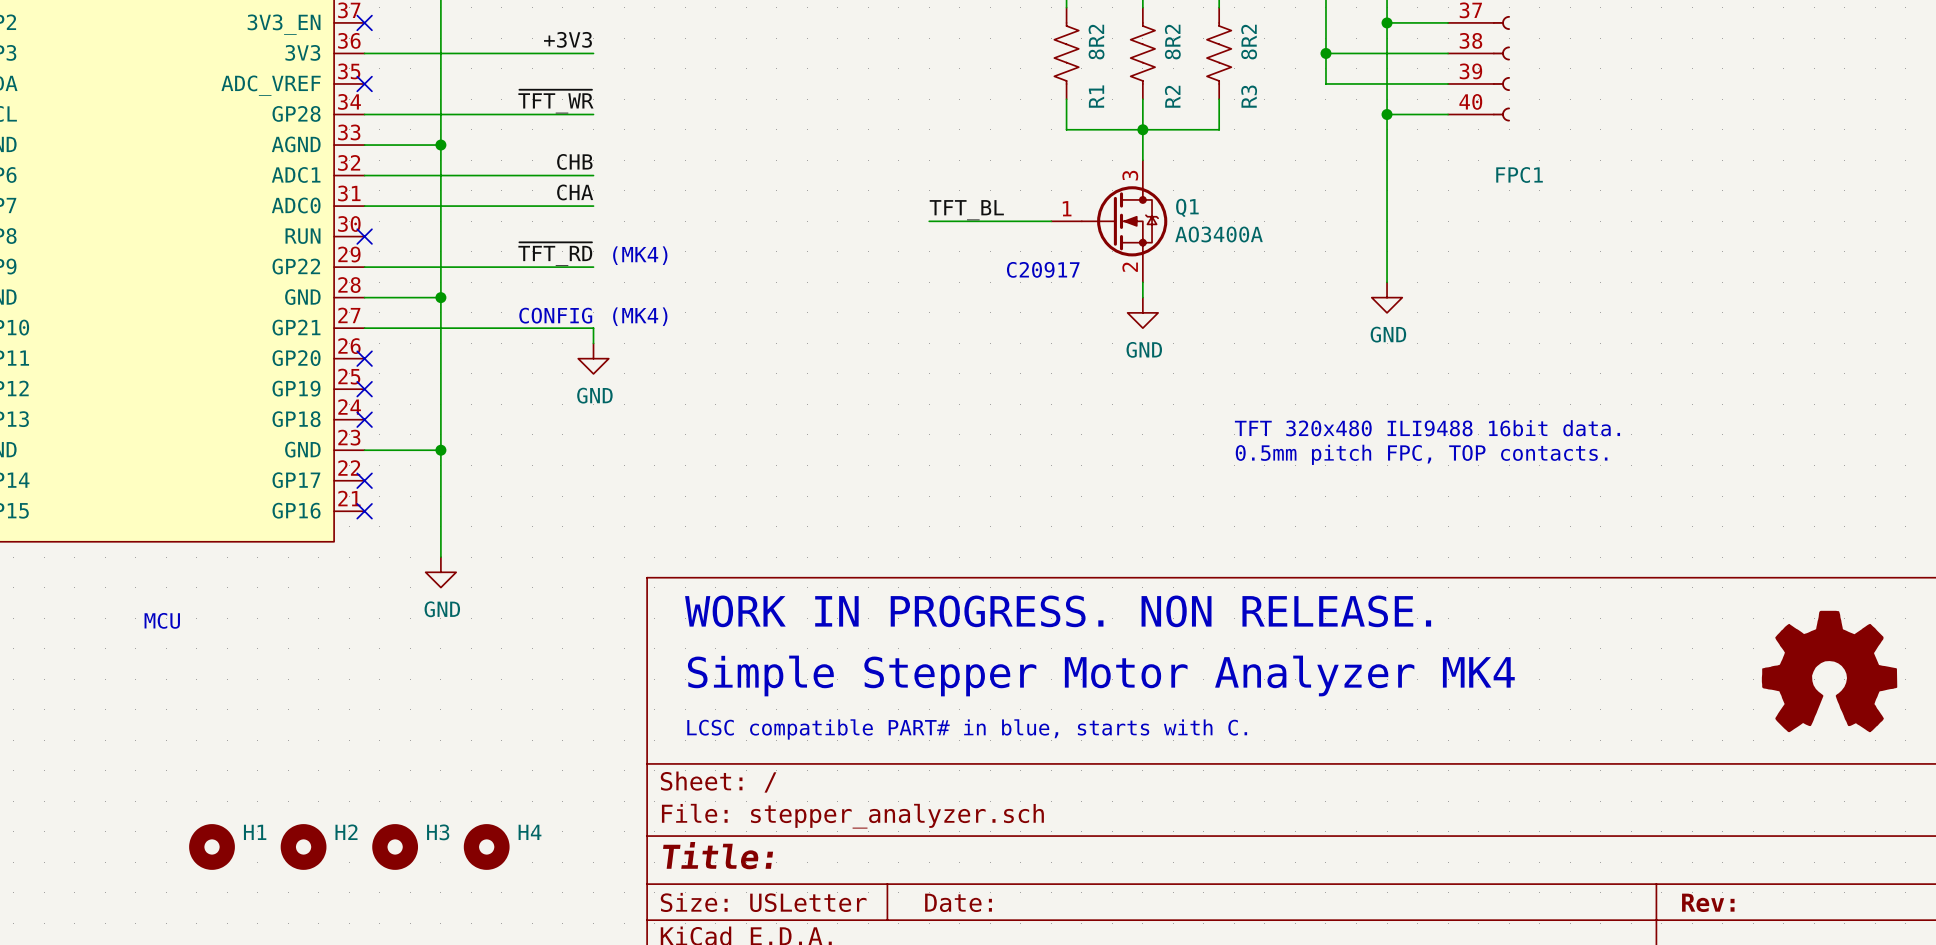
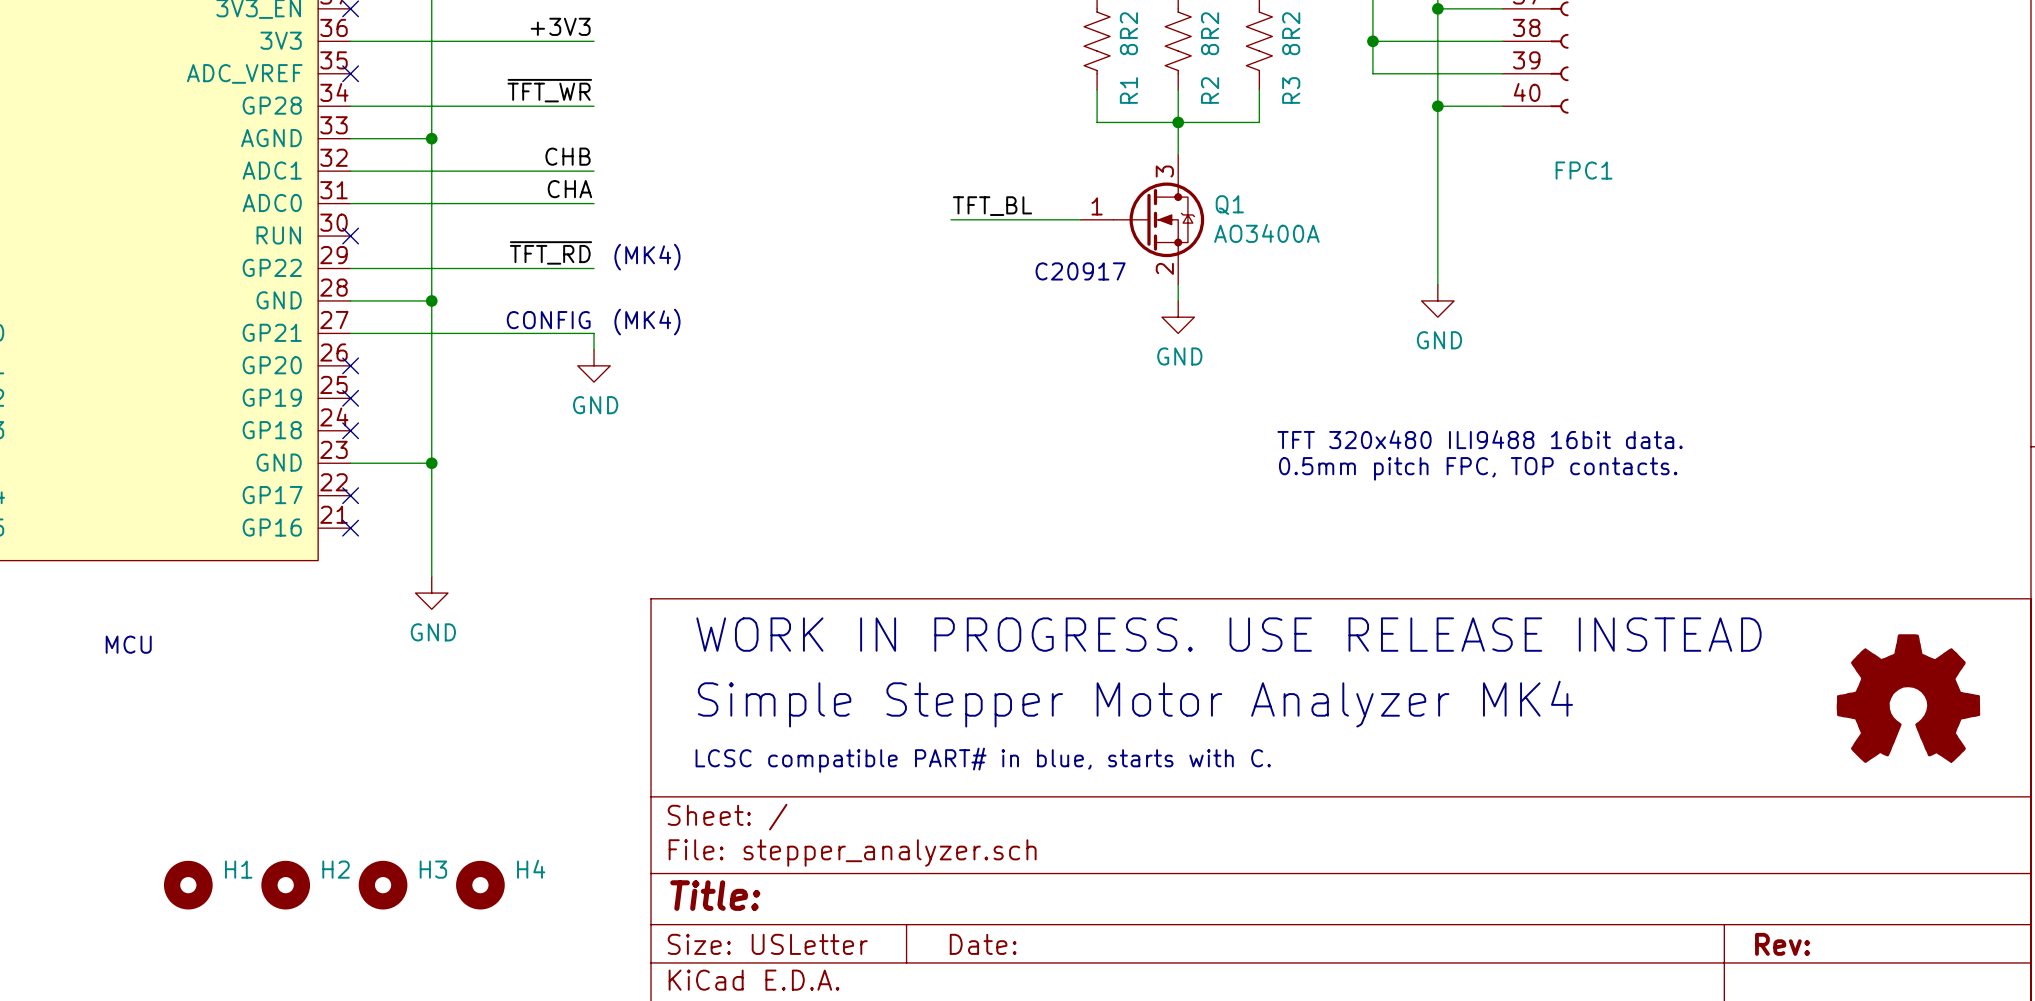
text: WORK IN PROGRESS. NON RELEASE. (1058, 611) -> WORK IN PROGRESS. USE RELEASE INSTEAD (1228, 634)

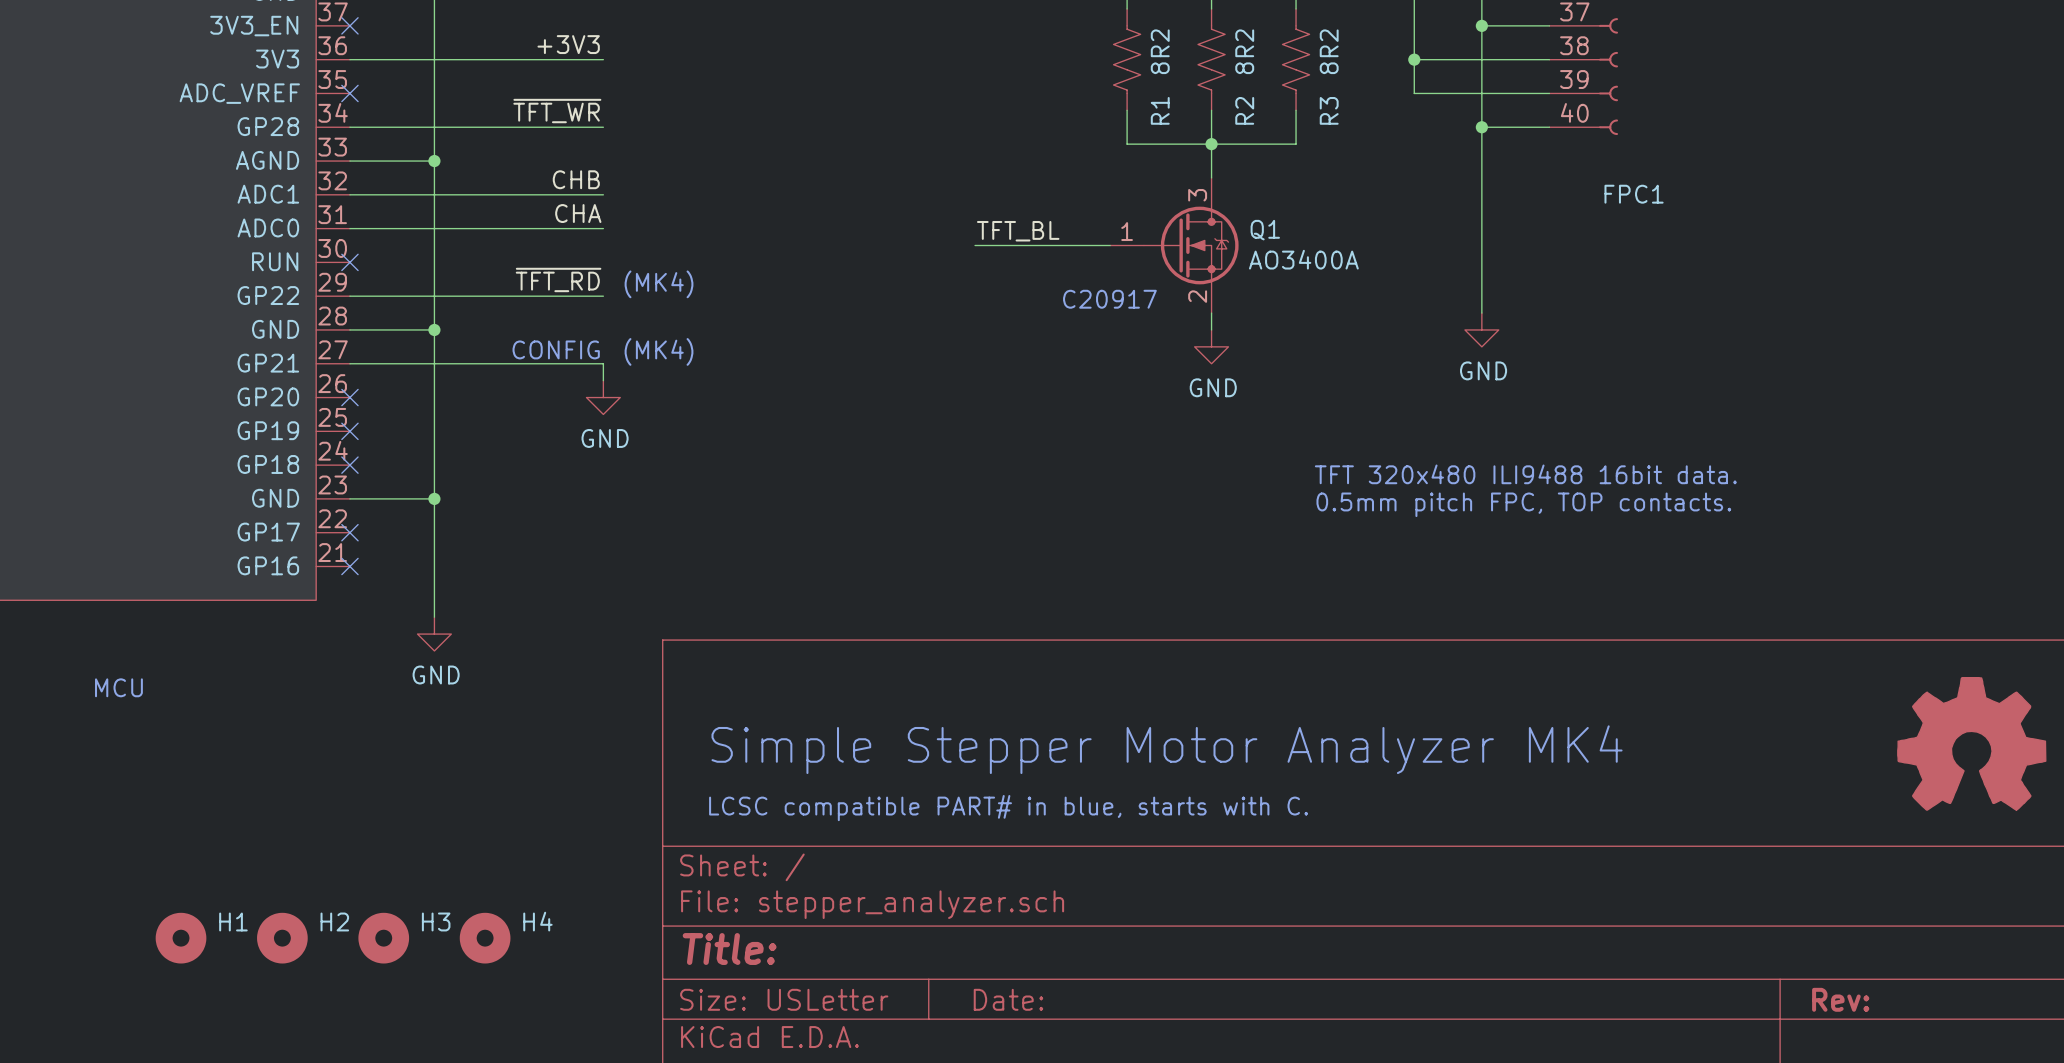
text: WORK IN PROGRESS. USE RELEASE INSTEAD (1228, 634) -> none

